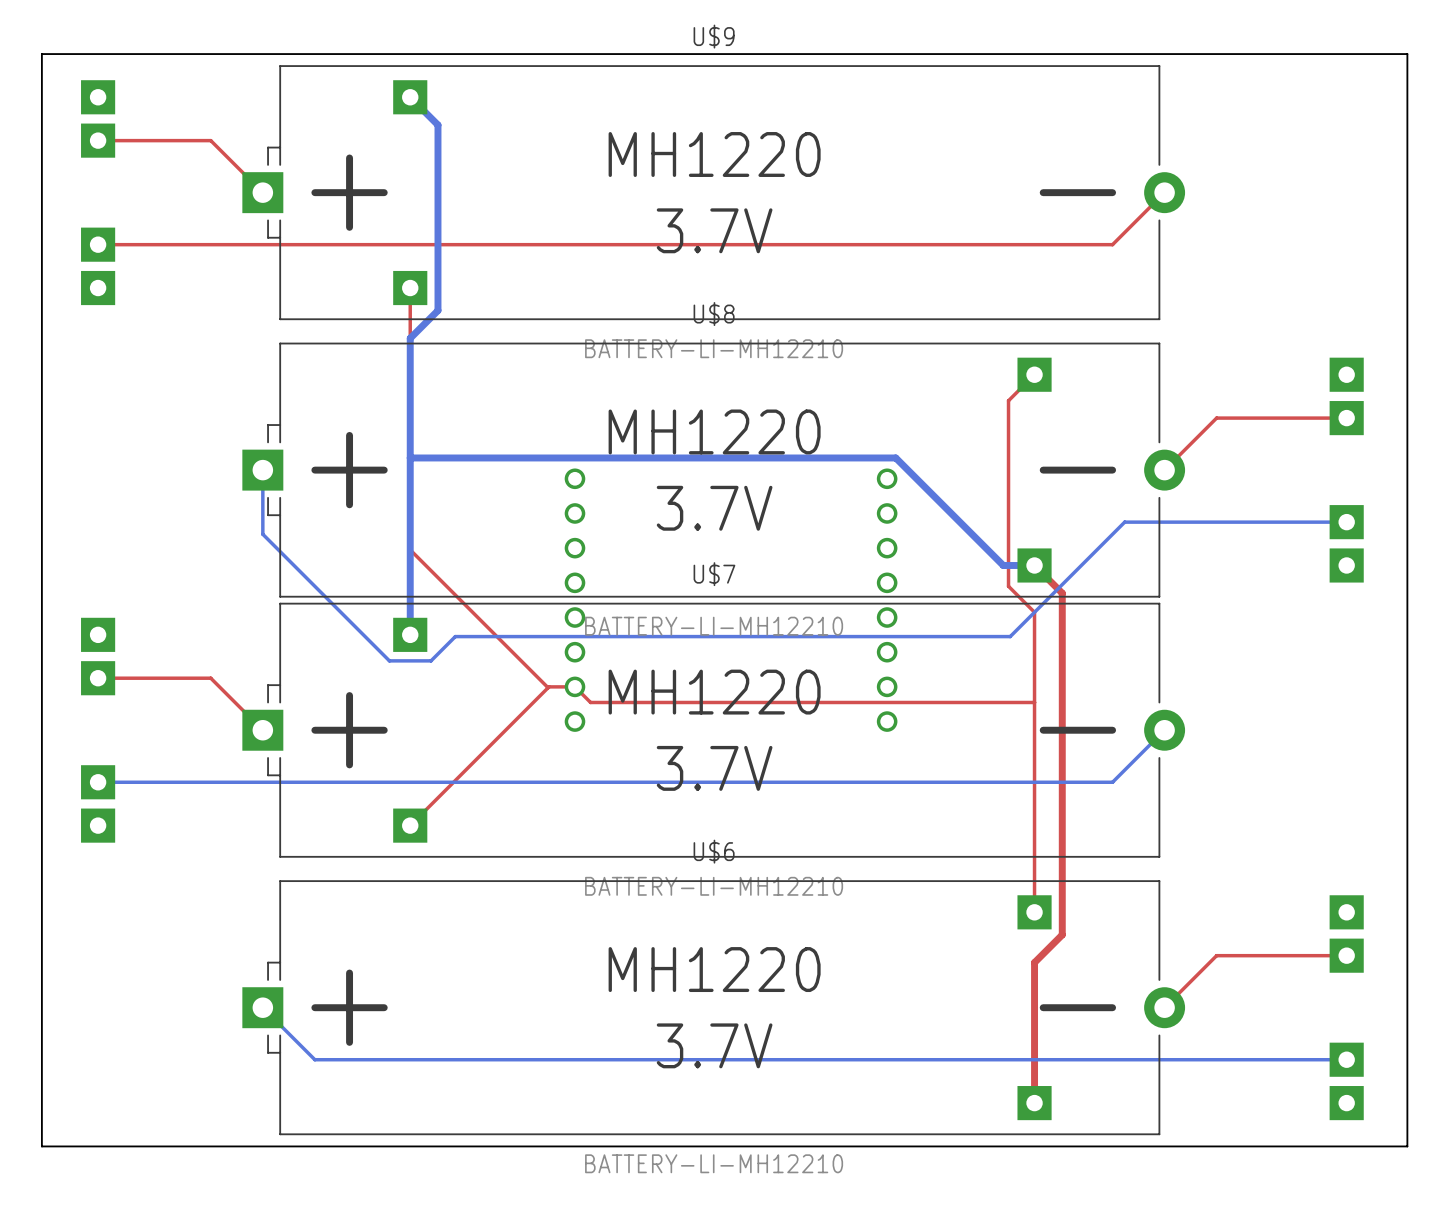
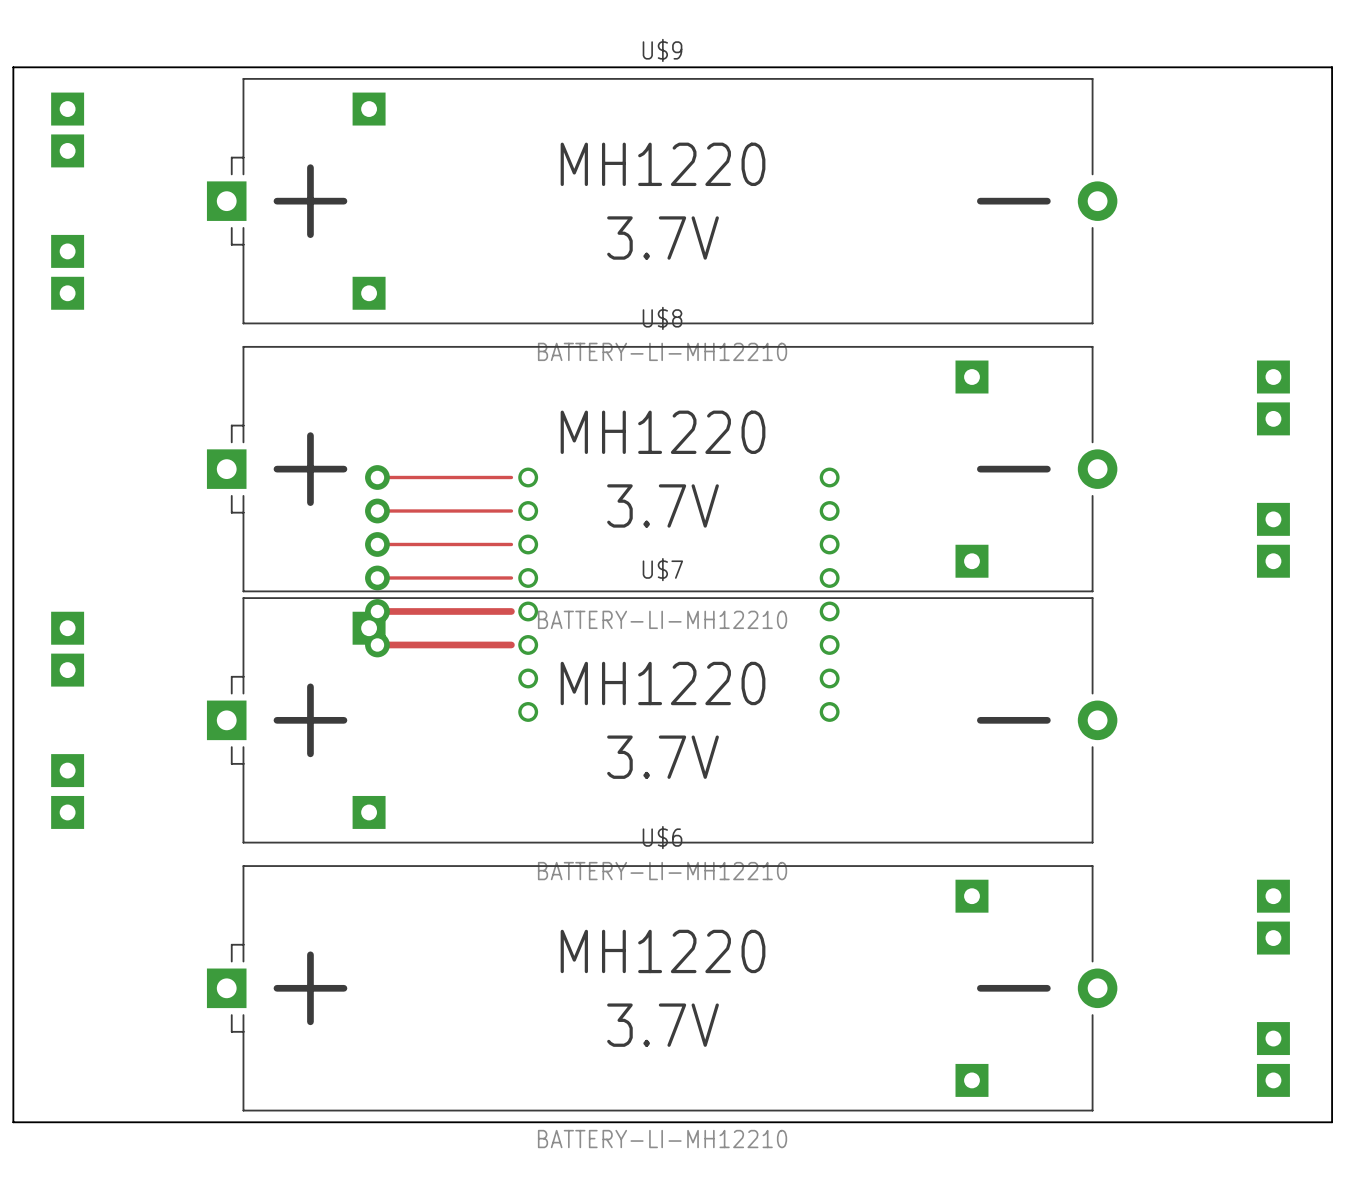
bottom track: (410, 97) (437, 125) (437, 310) (410, 338) (410, 634) -> none
top track: (98, 140) (210, 140) (262, 192) -> none
top track: (1164, 192) (1112, 244) (98, 244) -> none
top track: (410, 288) (410, 549) (548, 687) -> none
top track: (1034, 374) (1008, 400) (1008, 586) (1034, 612) (1034, 912) -> none
top track: (1346, 418) (1216, 418) (1164, 470) -> none
bottom track: (410, 457) (895, 457) (1003, 565) (1034, 565) -> none
bottom track: (262, 470) (262, 534) (389, 660) (431, 660) (455, 636) (1010, 636) (1124, 522) (1346, 522) -> none
top track: none -> (511, 477) (377, 477)
top track: none -> (511, 510) (377, 510)
top track: none -> (511, 544) (377, 544)
part: none -> (377, 561)
top track: (1034, 565) (1062, 593) (1062, 934) (1034, 962) (1034, 1103) -> none
top track: none -> (511, 577) (377, 577)
top track: none -> (511, 611) (377, 611)
top track: none -> (511, 644) (377, 644)
top track: (98, 678) (210, 678) (262, 730) -> none
top track: (1034, 702) (590, 702) (574, 686) (548, 686) (410, 825) -> none
bottom track: (1164, 730) (1112, 782) (98, 782) -> none
top track: (1346, 955) (1216, 955) (1164, 1007) -> none
bottom track: (262, 1007) (314, 1059) (1346, 1059) -> none

